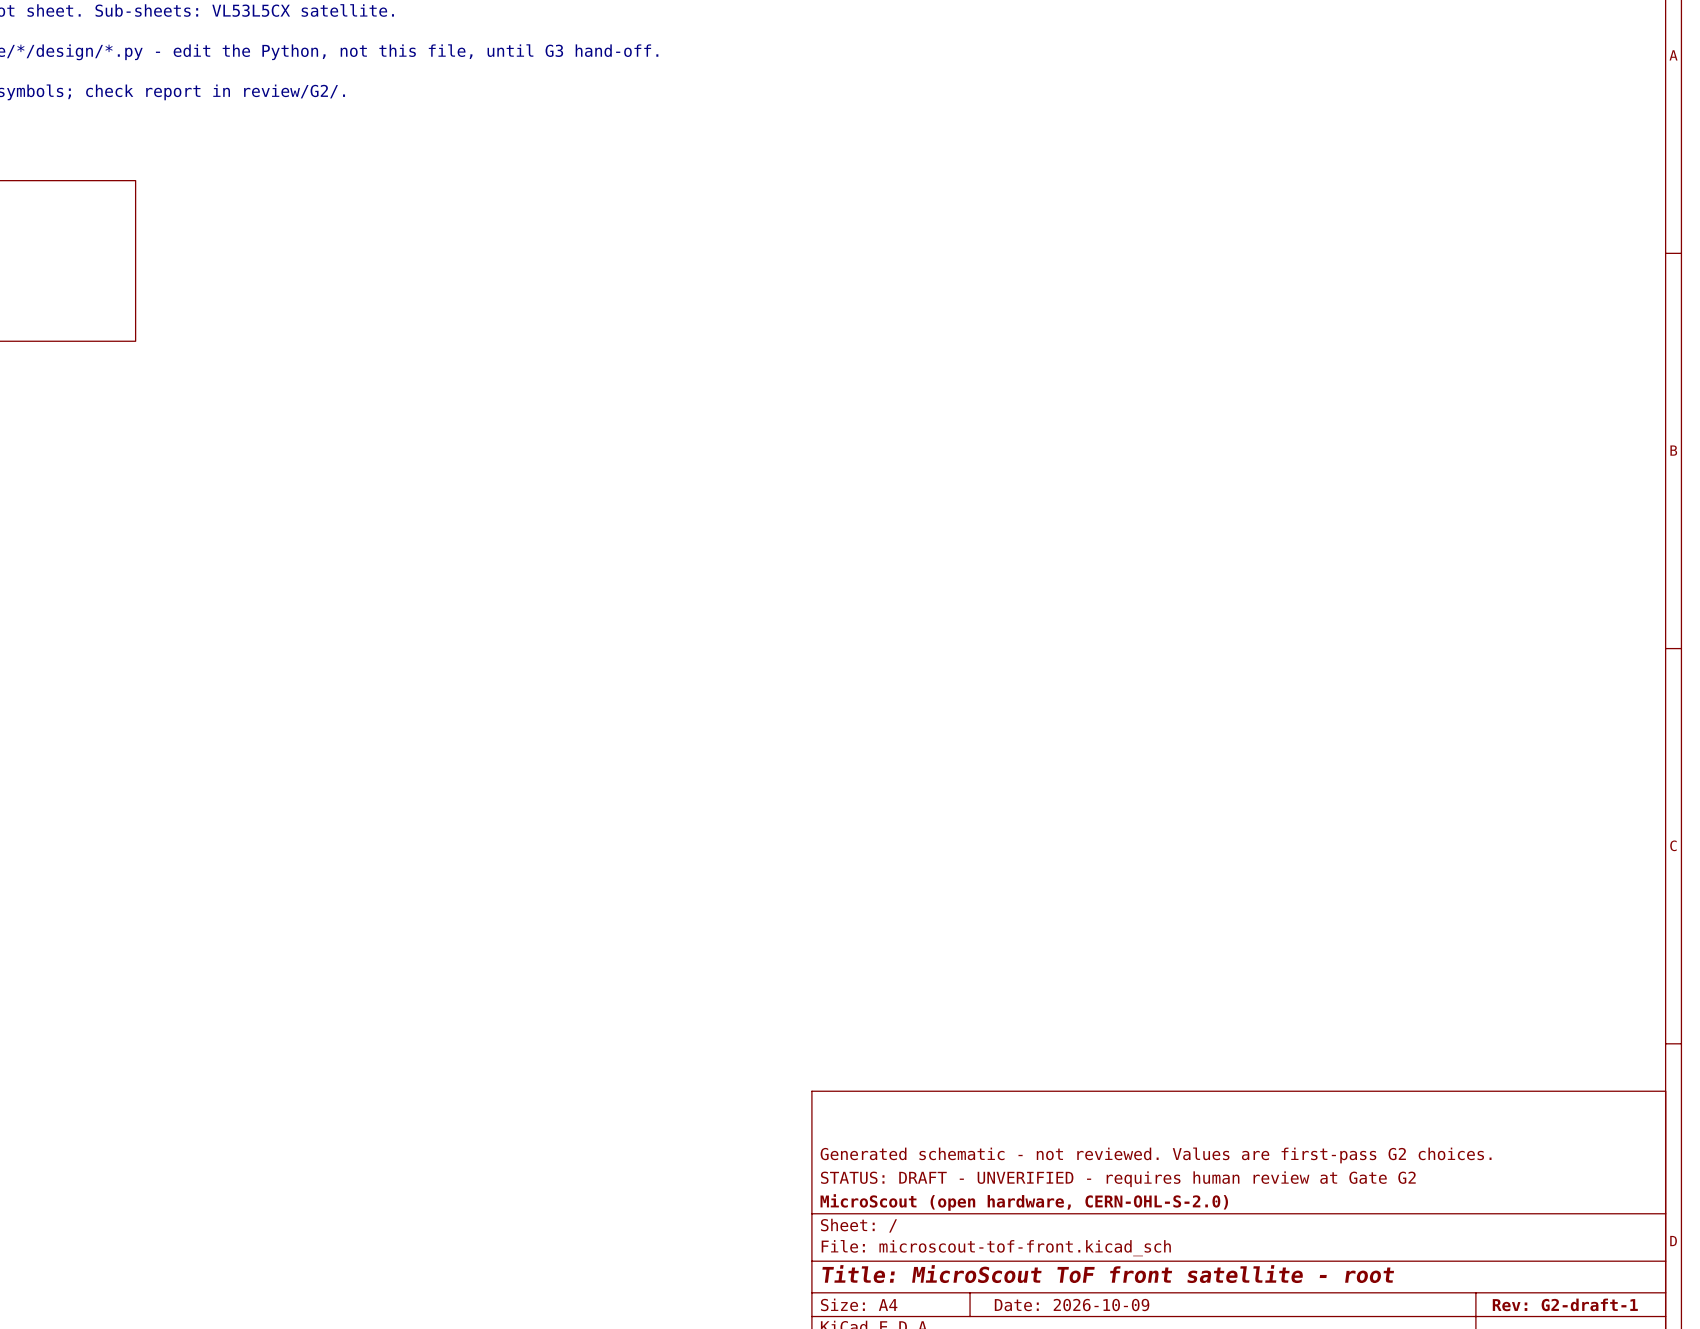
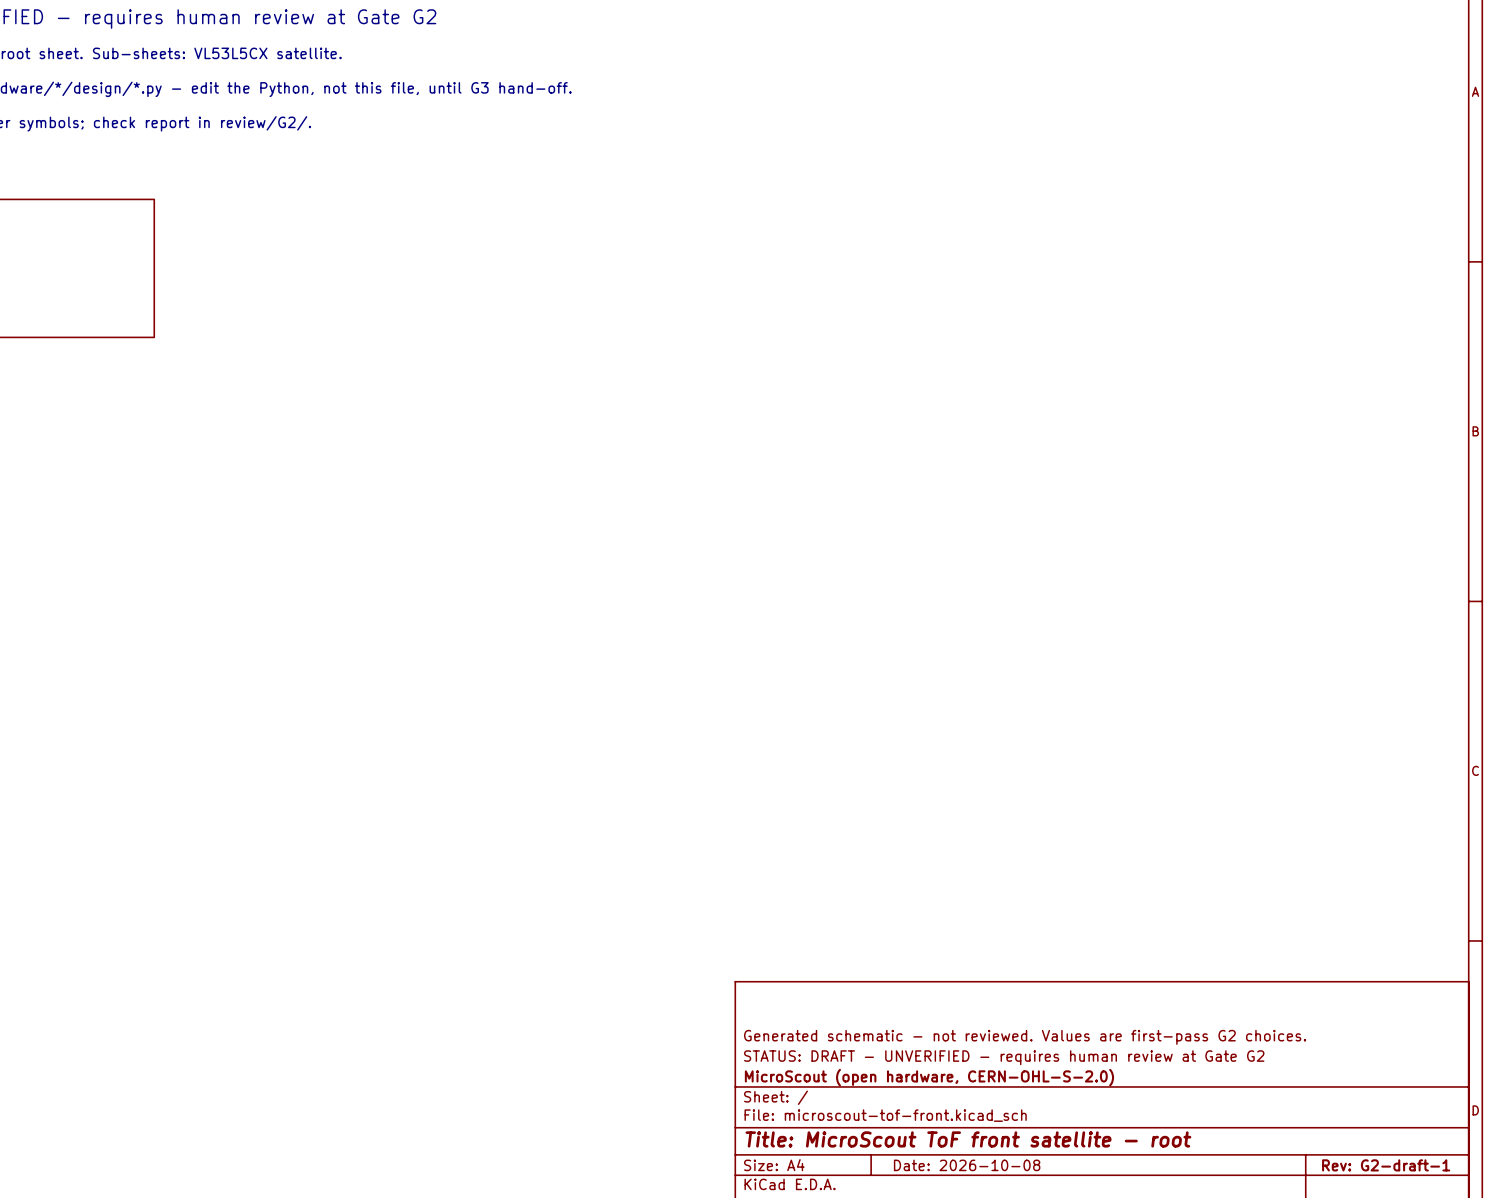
title block: Date: 2026-10-09 (1072, 1305) -> Date: 2026-10-08 (967, 1165)

